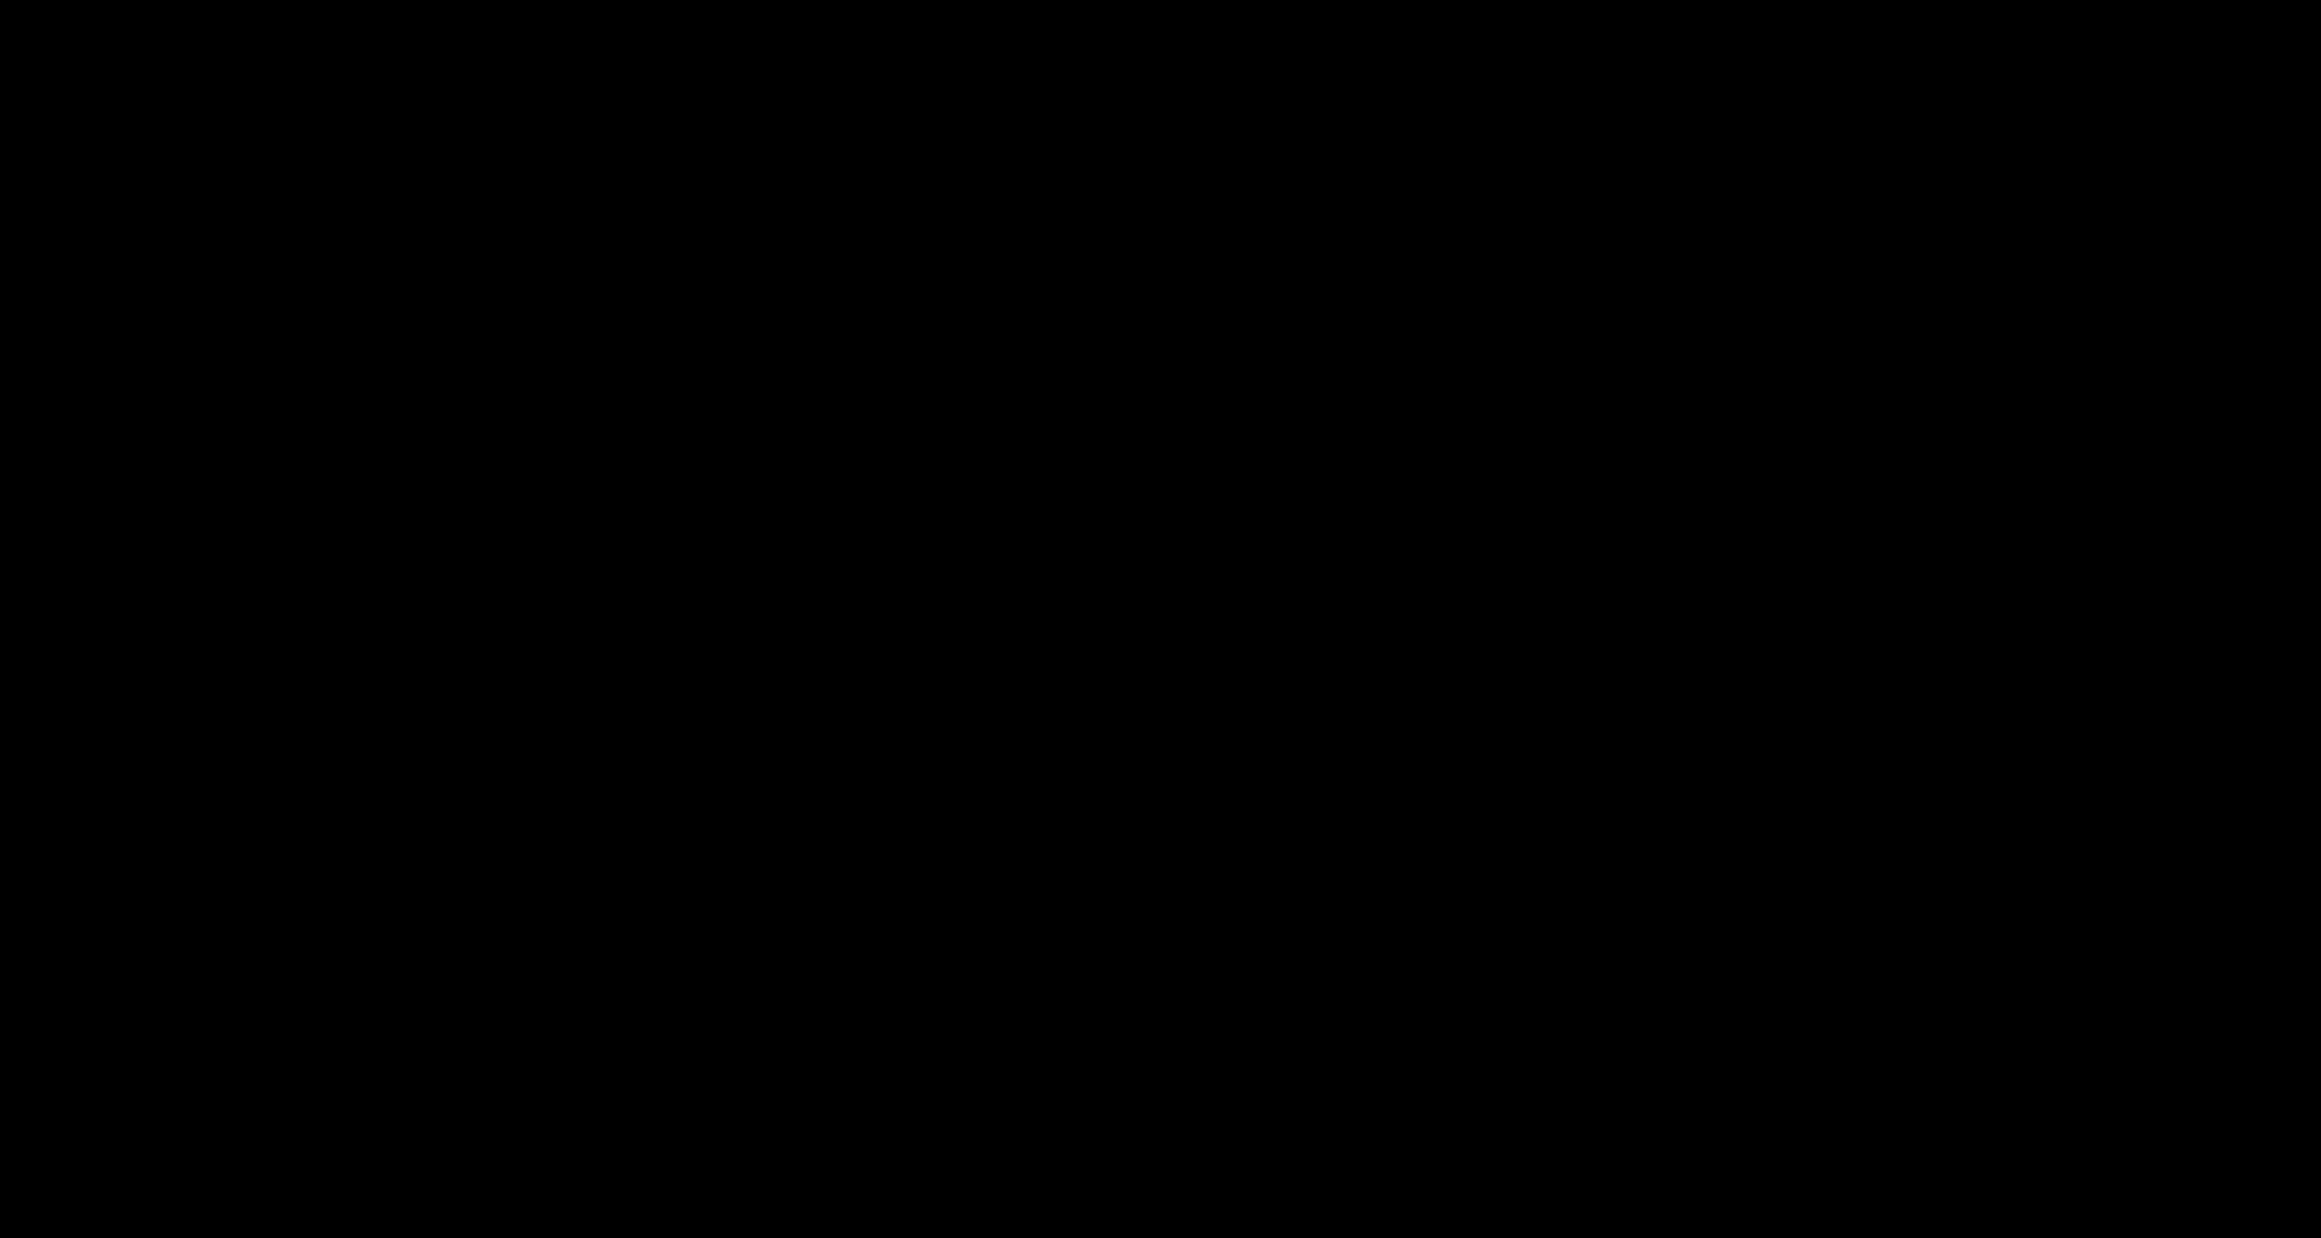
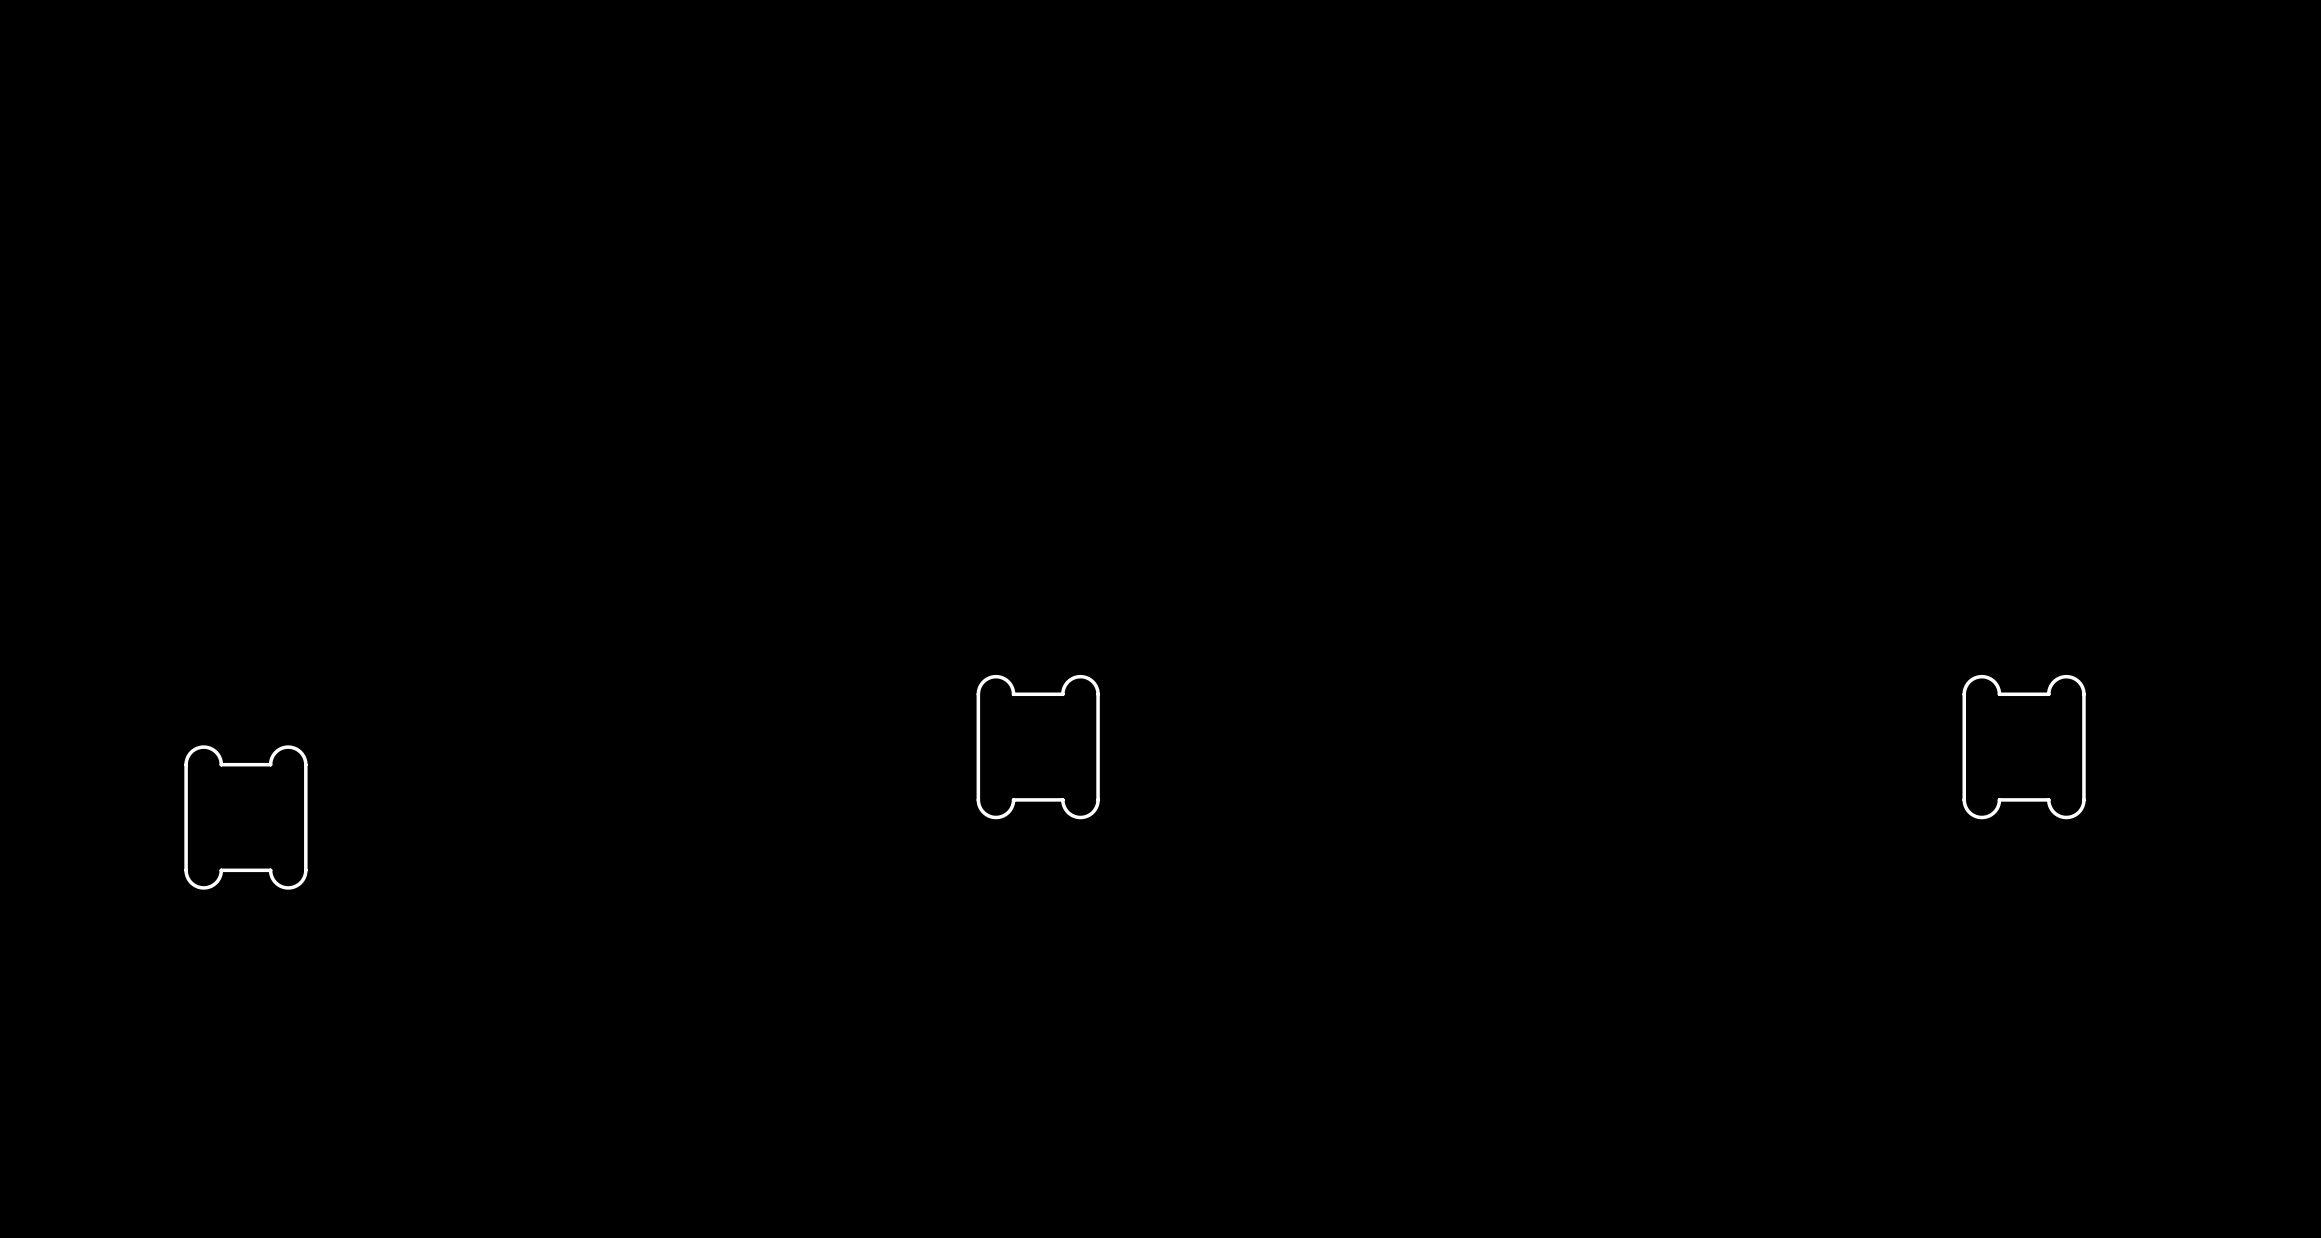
part: none -> (1038, 747)
part: none -> (2024, 747)
part: none -> (245, 817)

